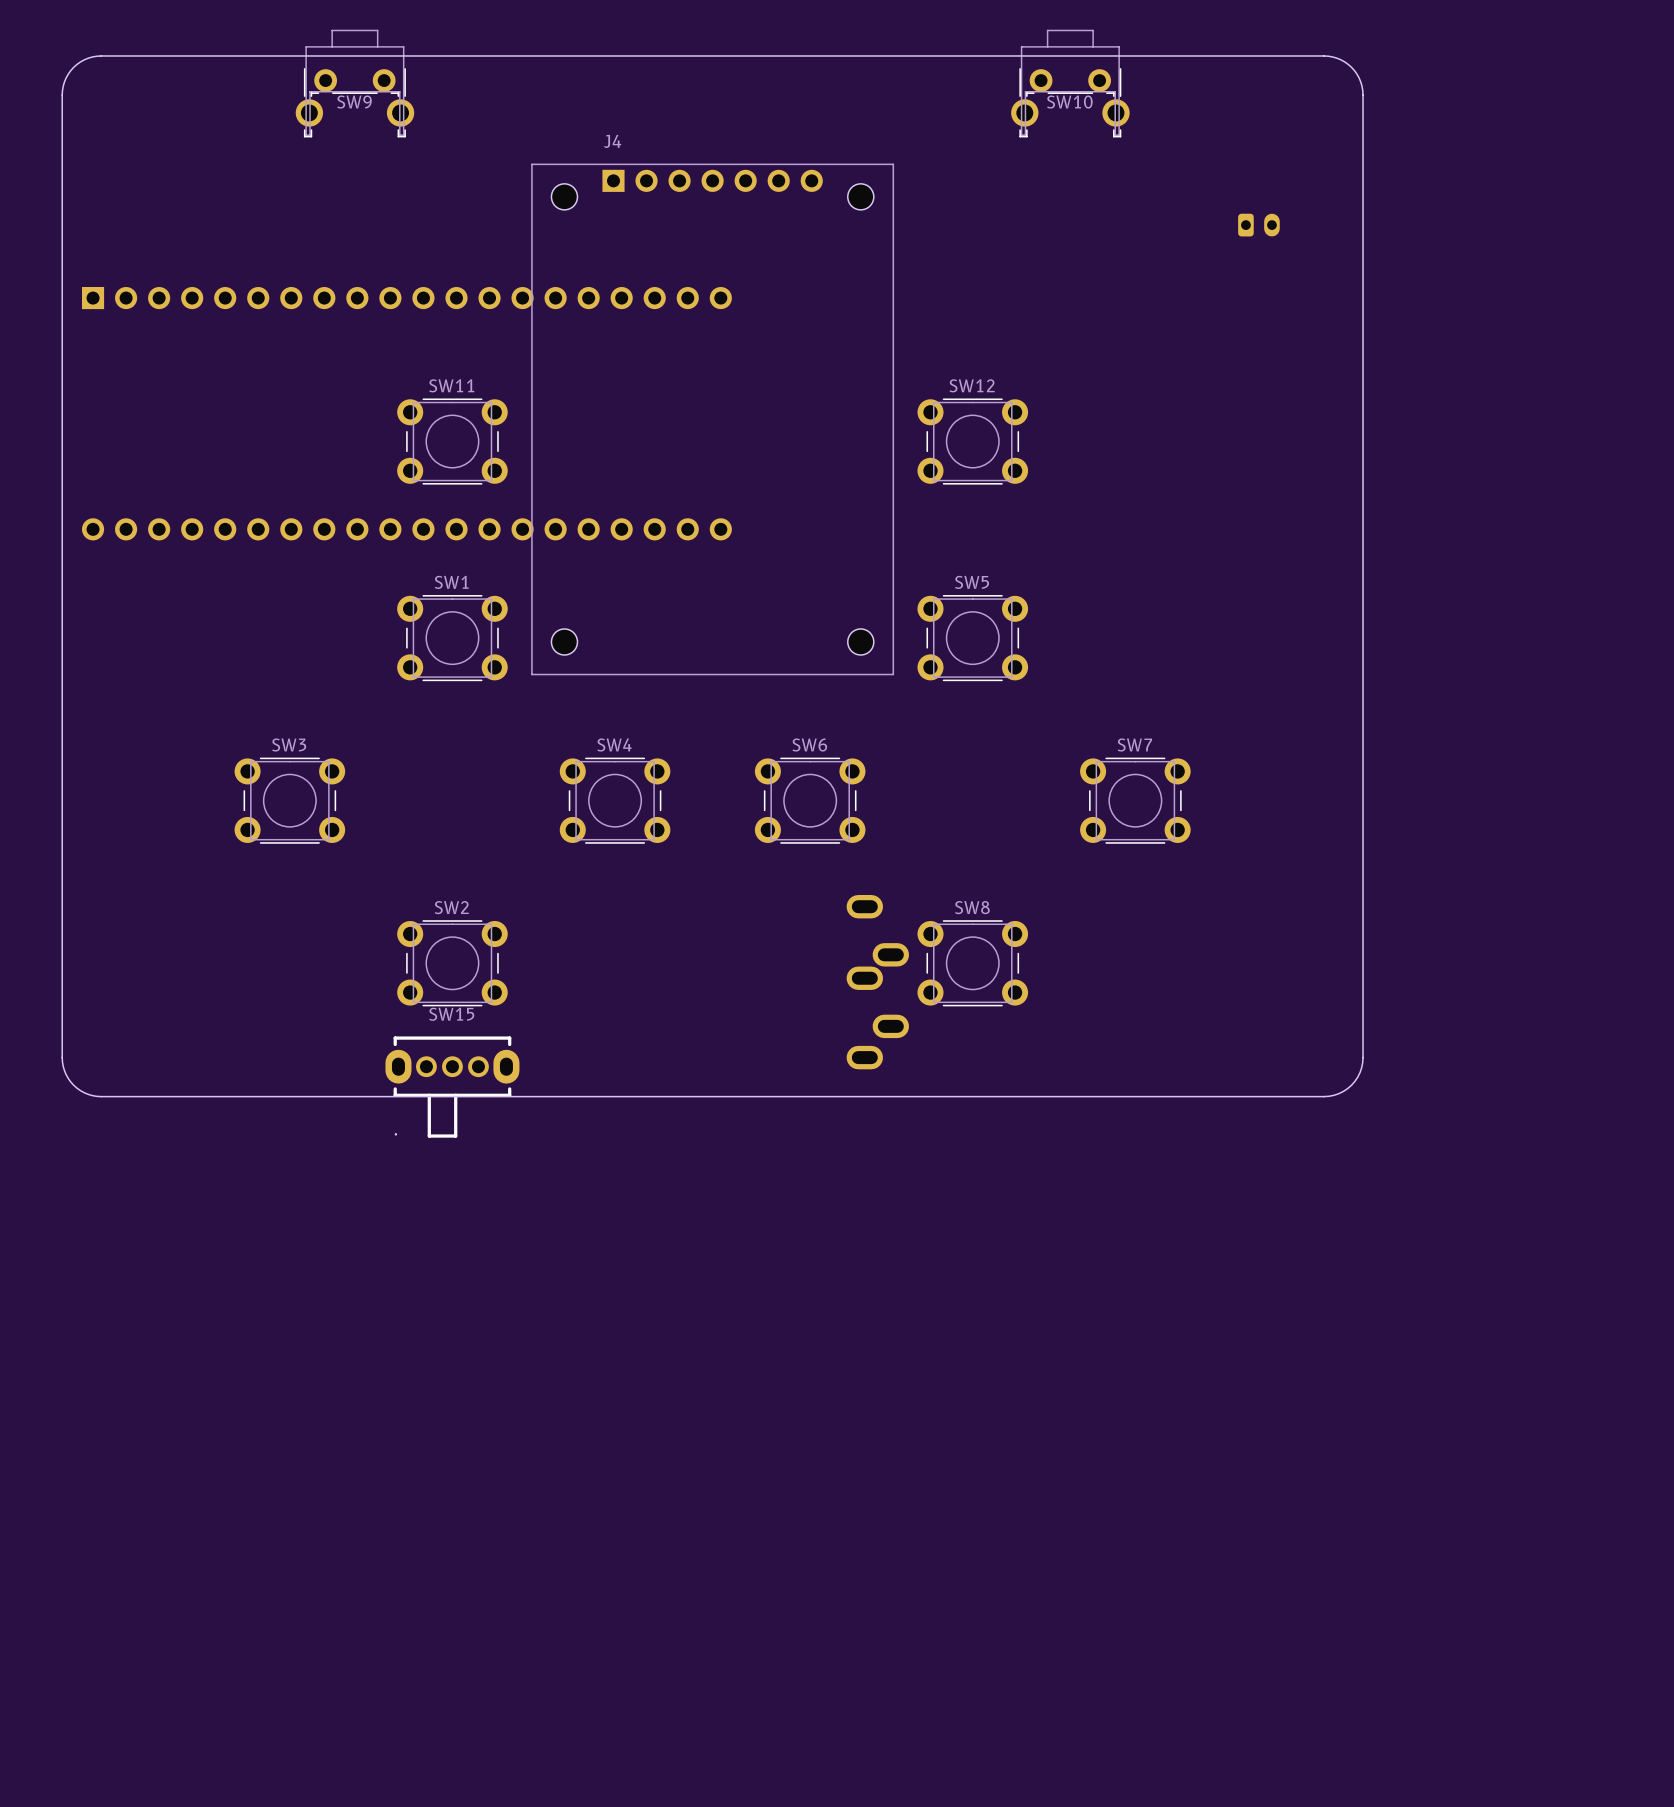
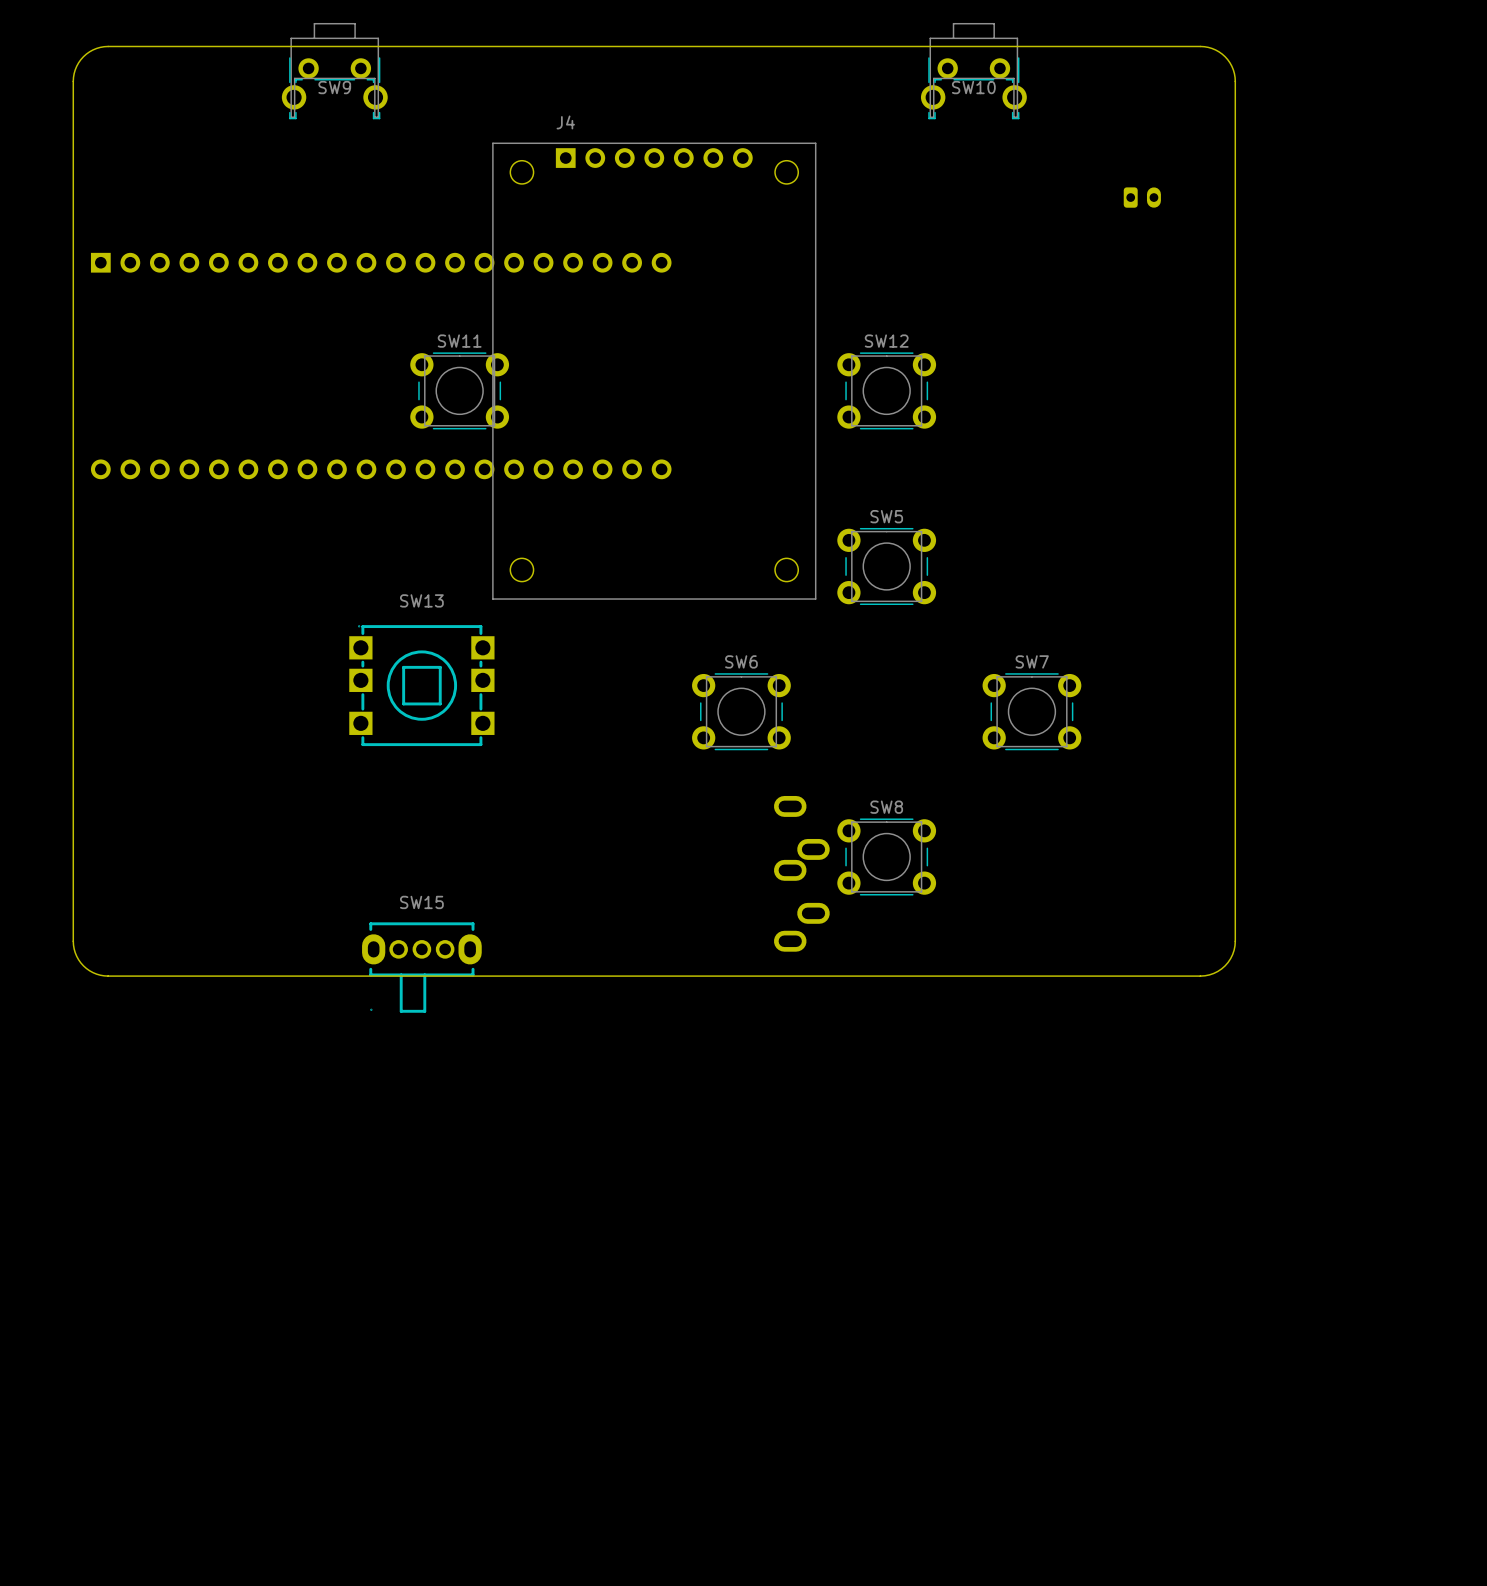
SW11 position: (452, 441) -> (459, 390)
SW1: (452, 638) -> none
SW13: none -> (421, 685)
SW3: (289, 800) -> none
SW4: (615, 800) -> none
SW2: (452, 963) -> none

